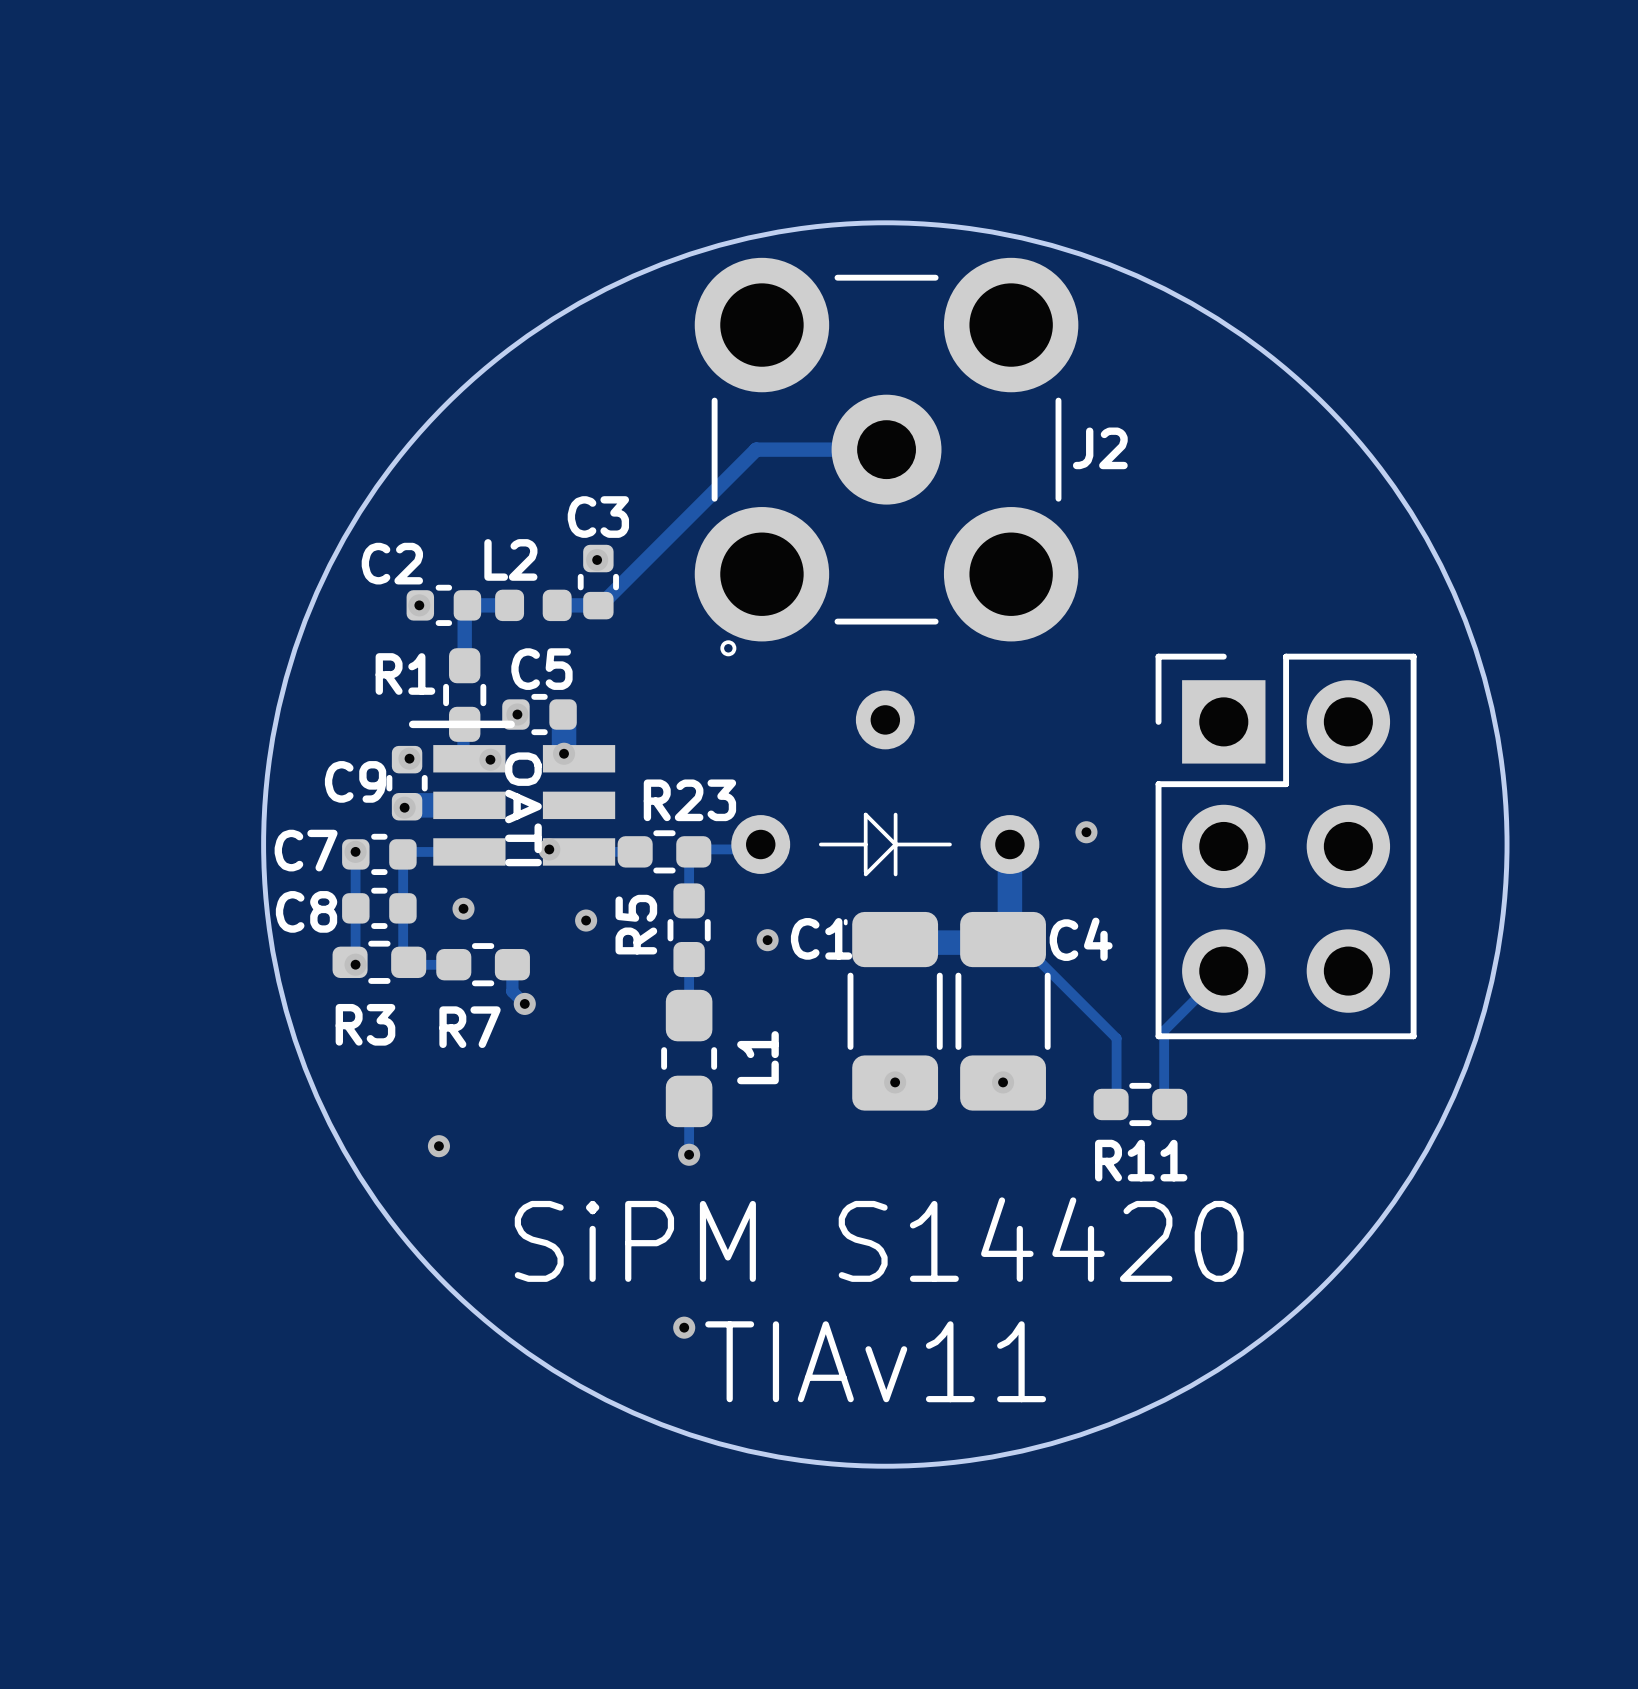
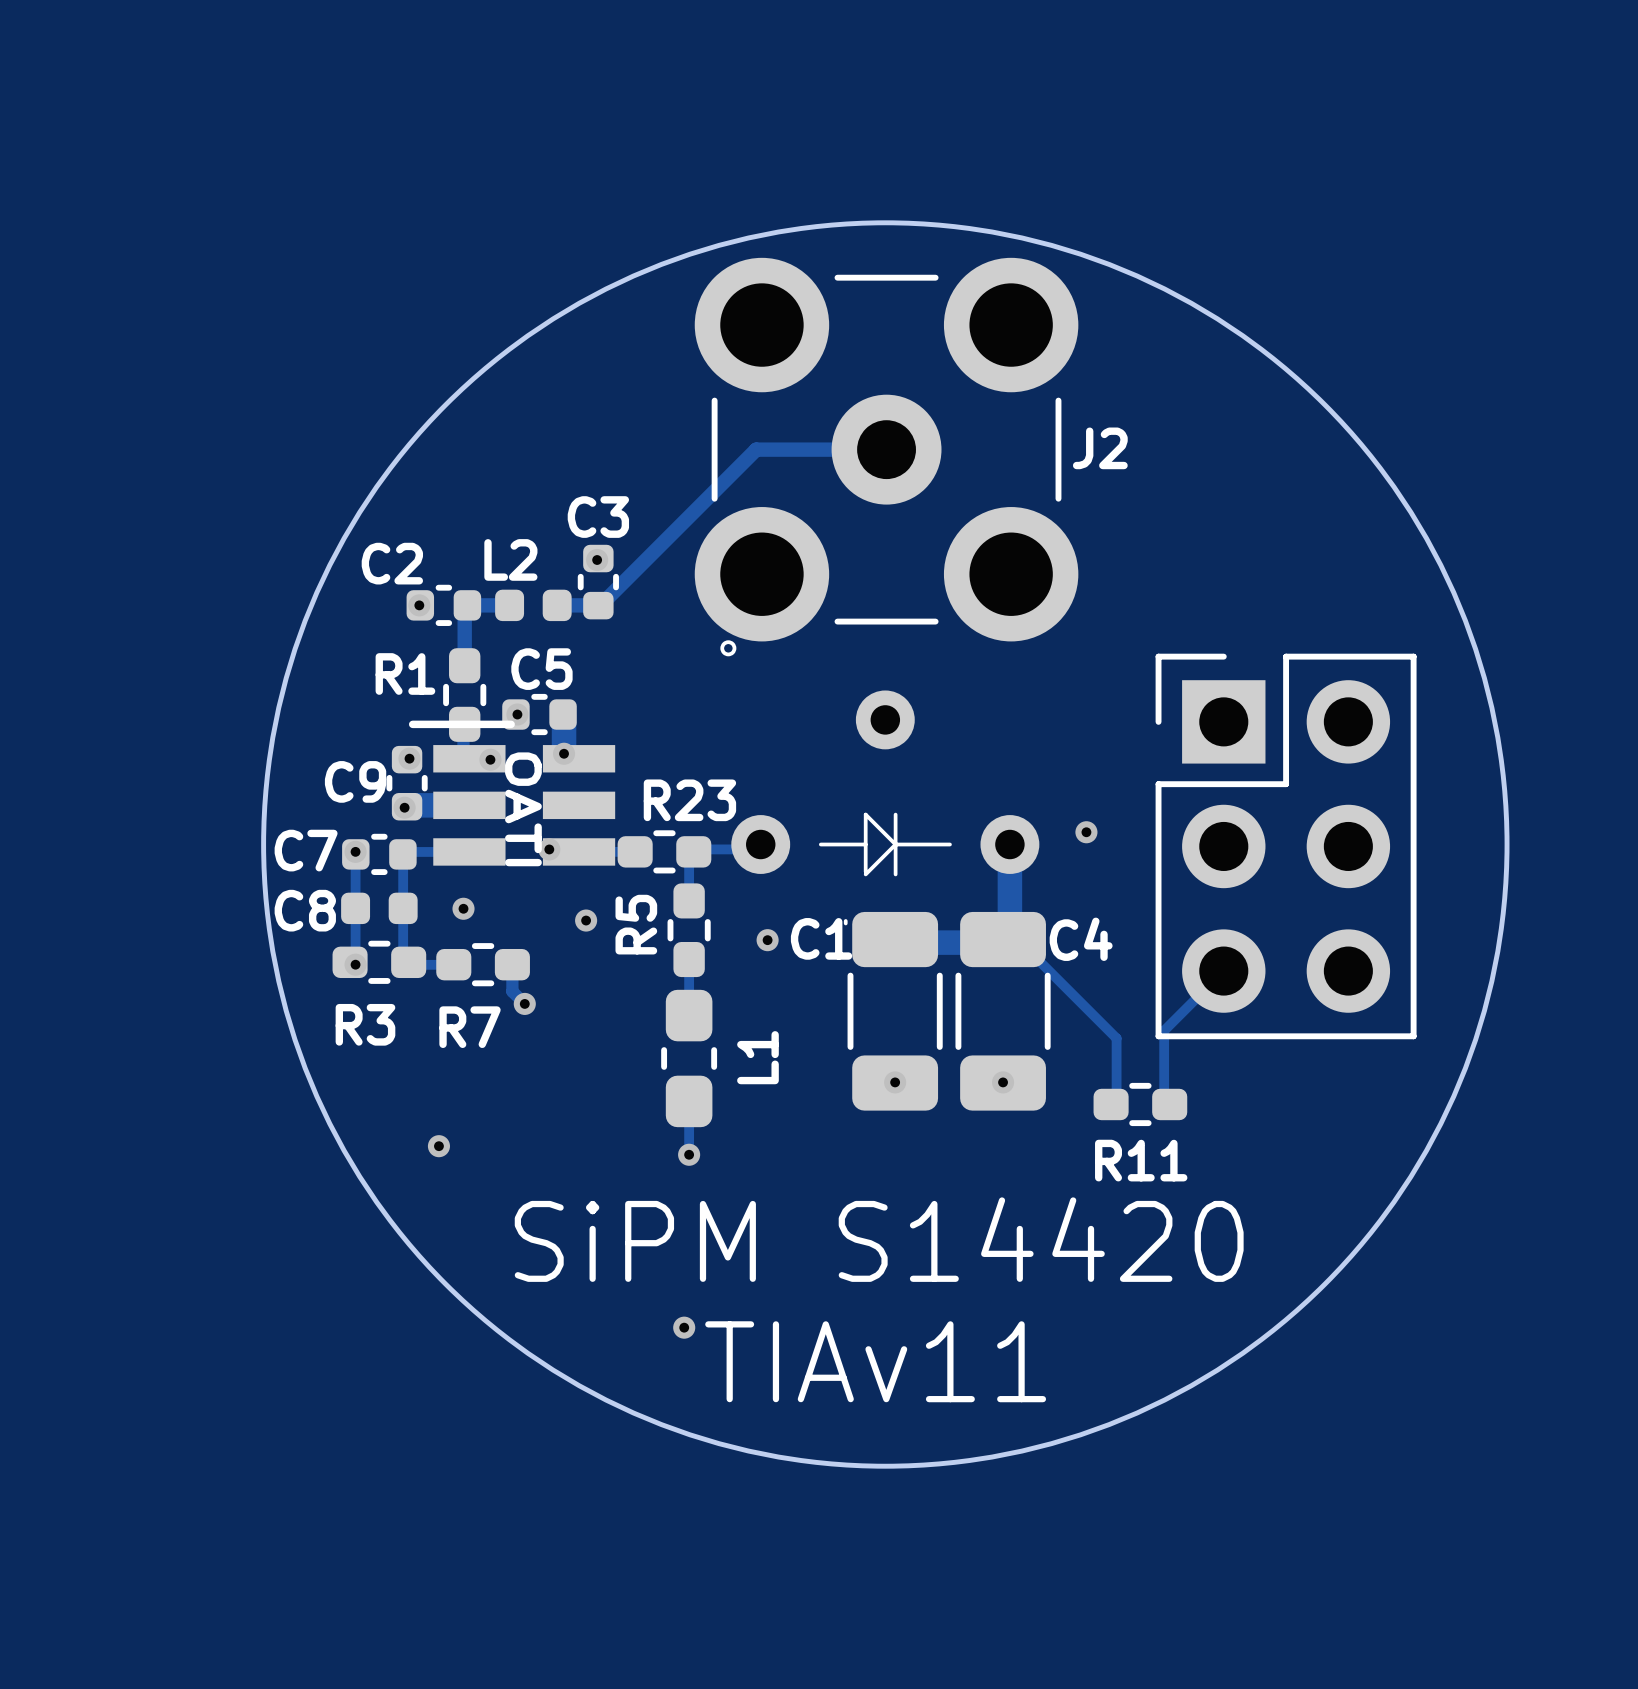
C8 footprint: [342, 887, 417, 929] -> [341, 892, 418, 925]

